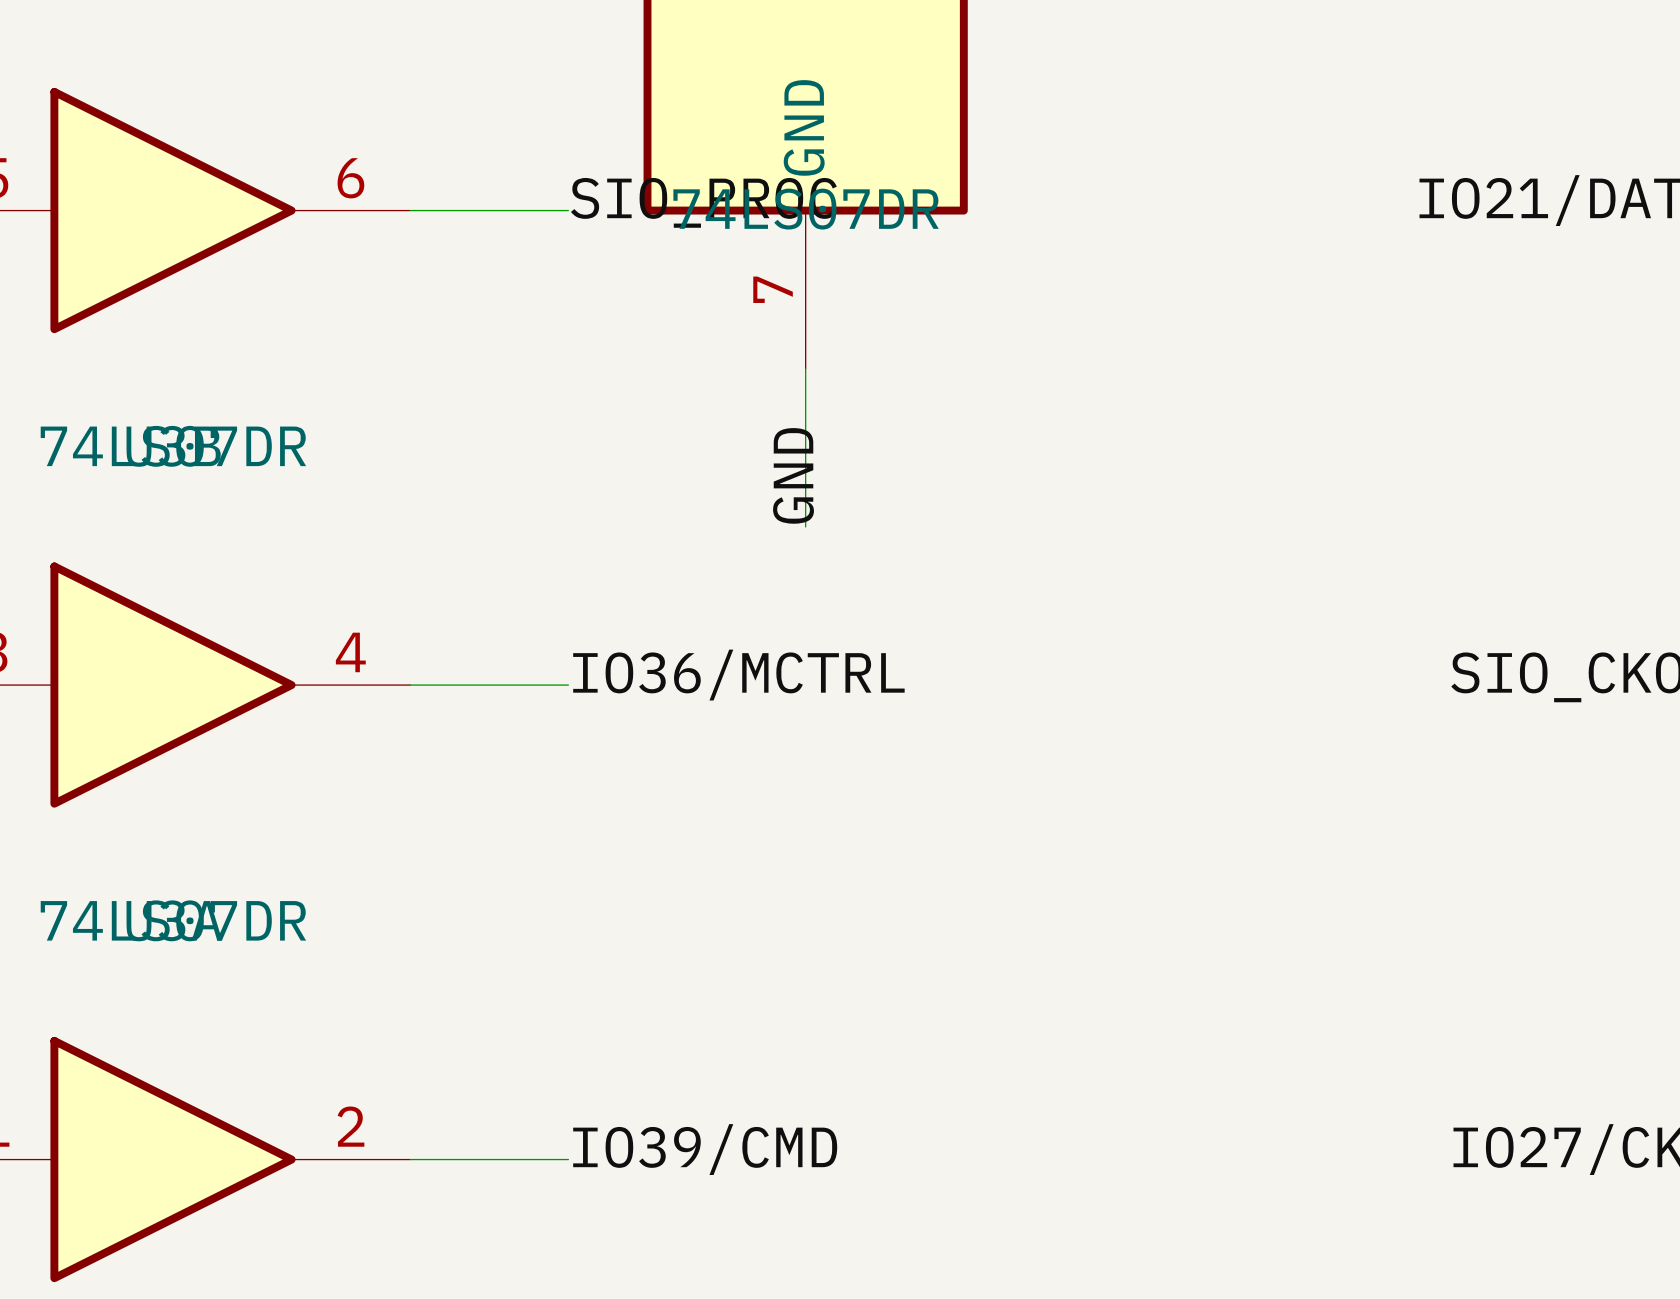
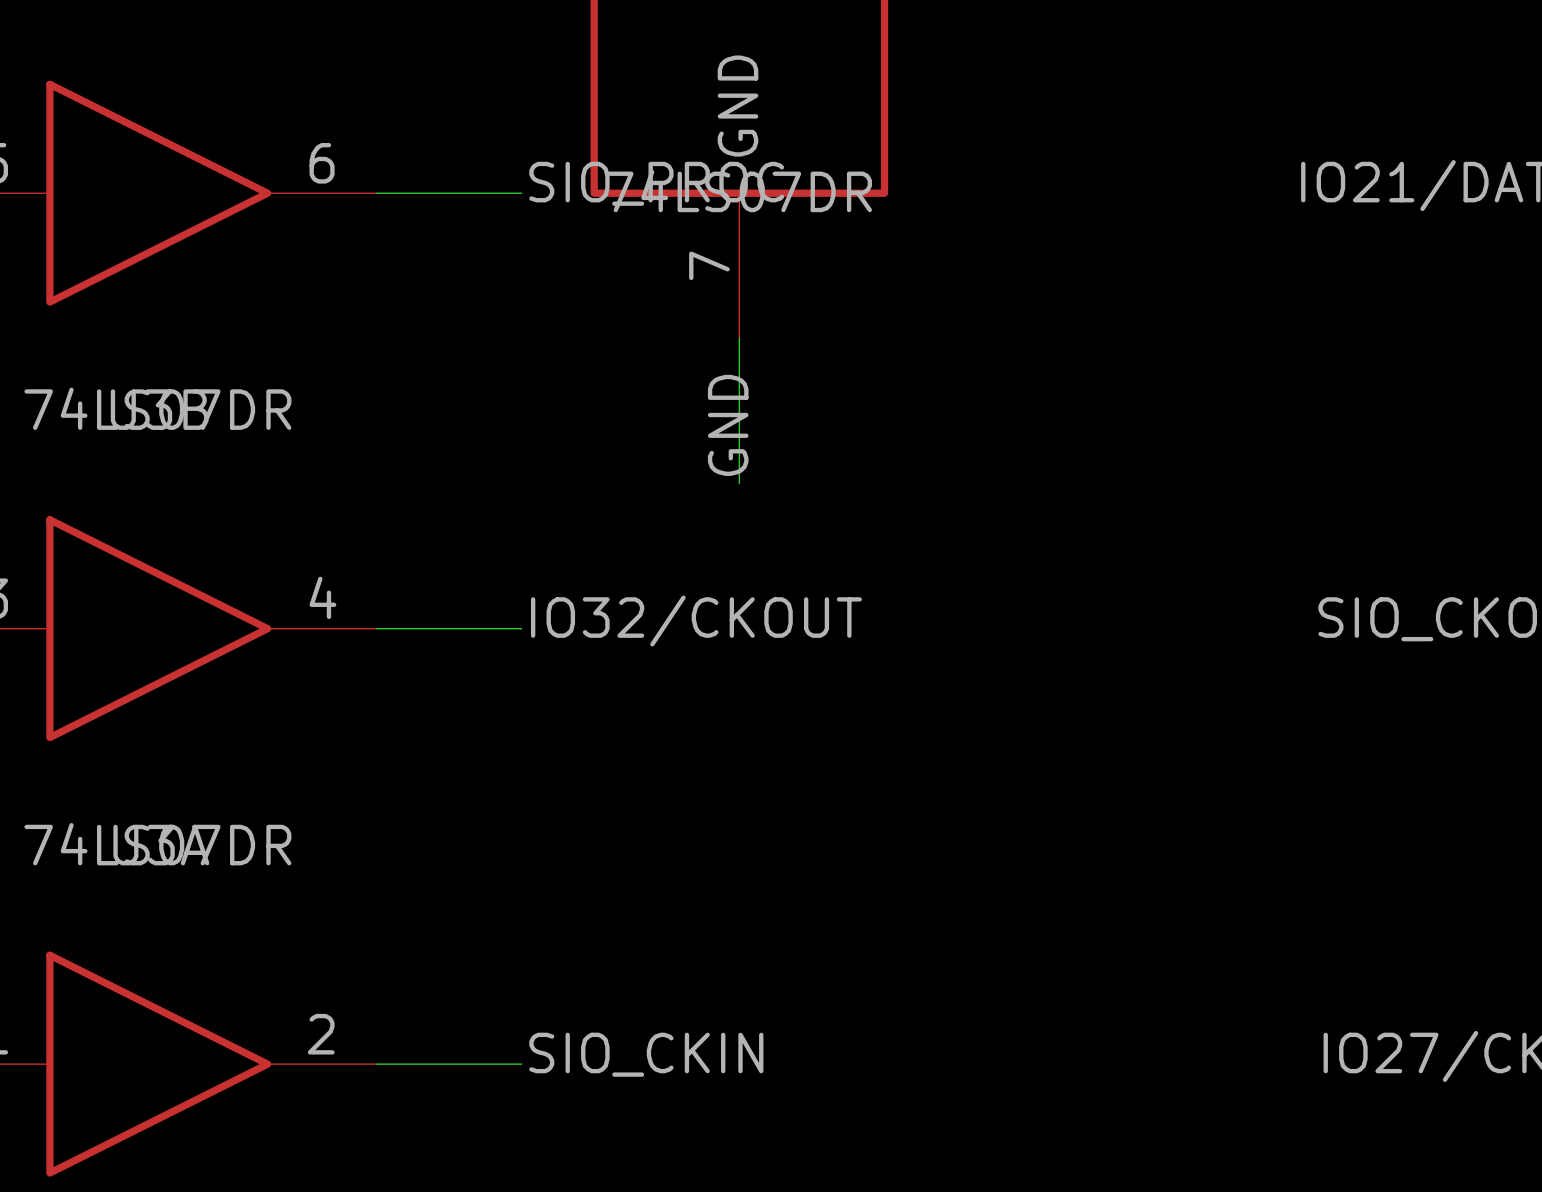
label: IO36/MCTRL (738, 675) -> IO32/CKOUT (696, 620)
label: IO39/CMD (705, 1149) -> SIO_CKIN (646, 1054)

